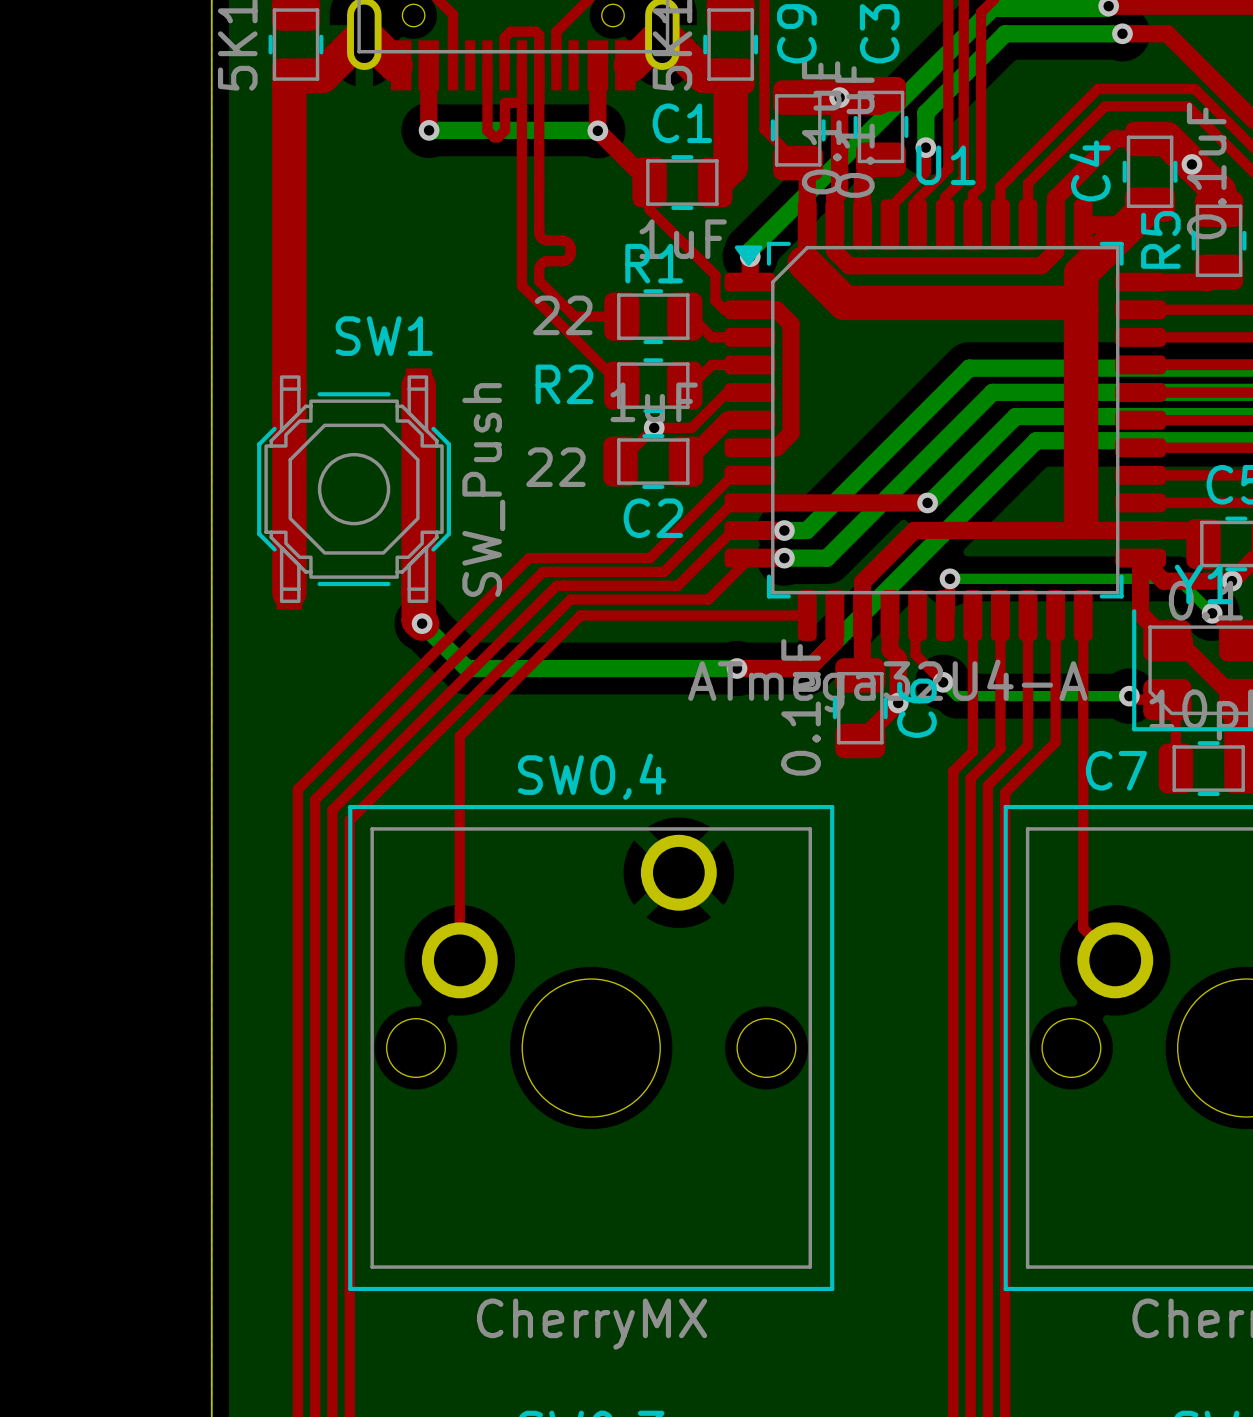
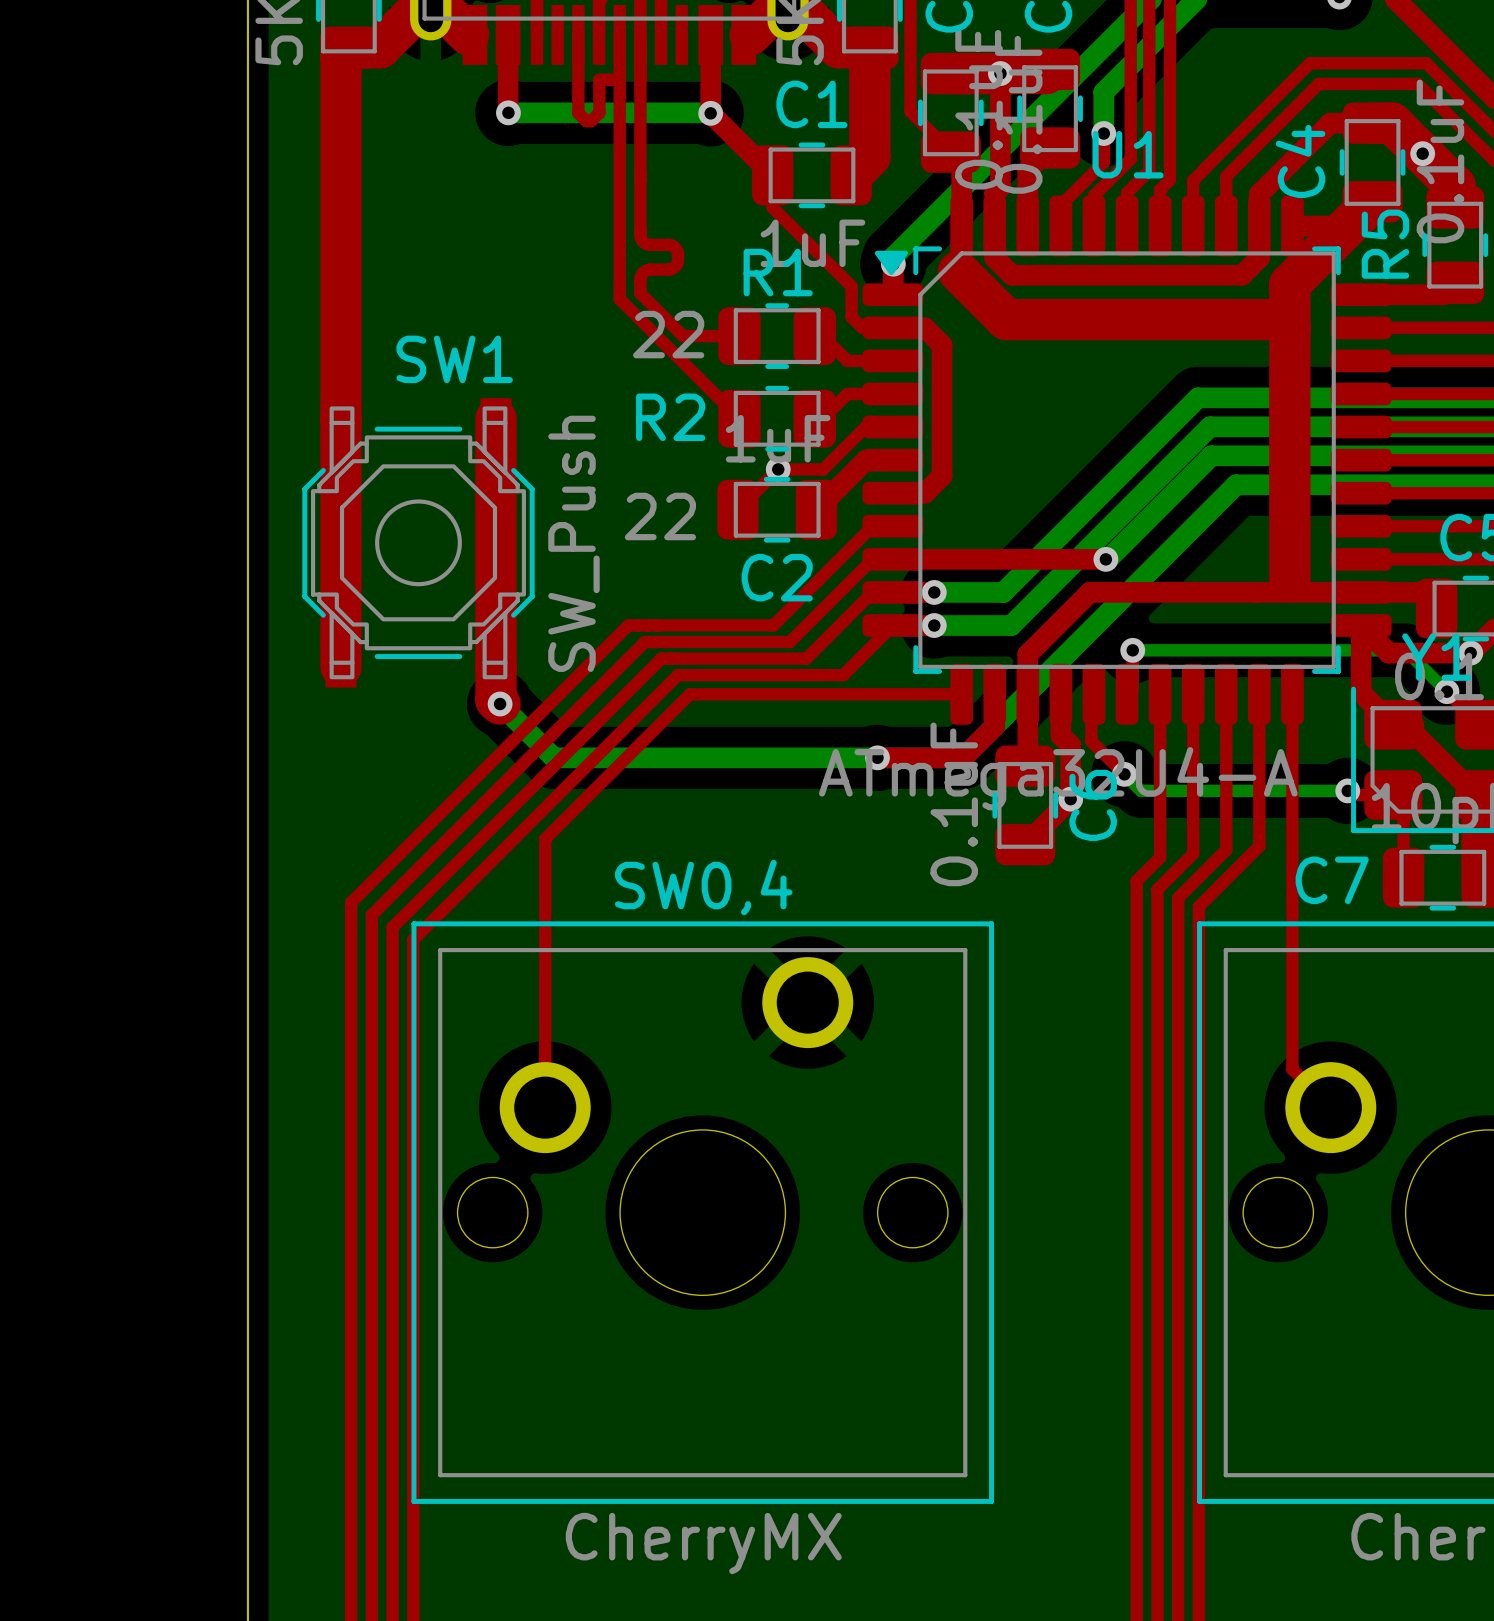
bottom track: (1004, 368) (969, 368) (806, 530) -> (1197, 397) (1003, 592) (961, 592)
bottom track: (1014, 392) (992, 392) (826, 558) -> (1209, 426) (1011, 625) (985, 625)

